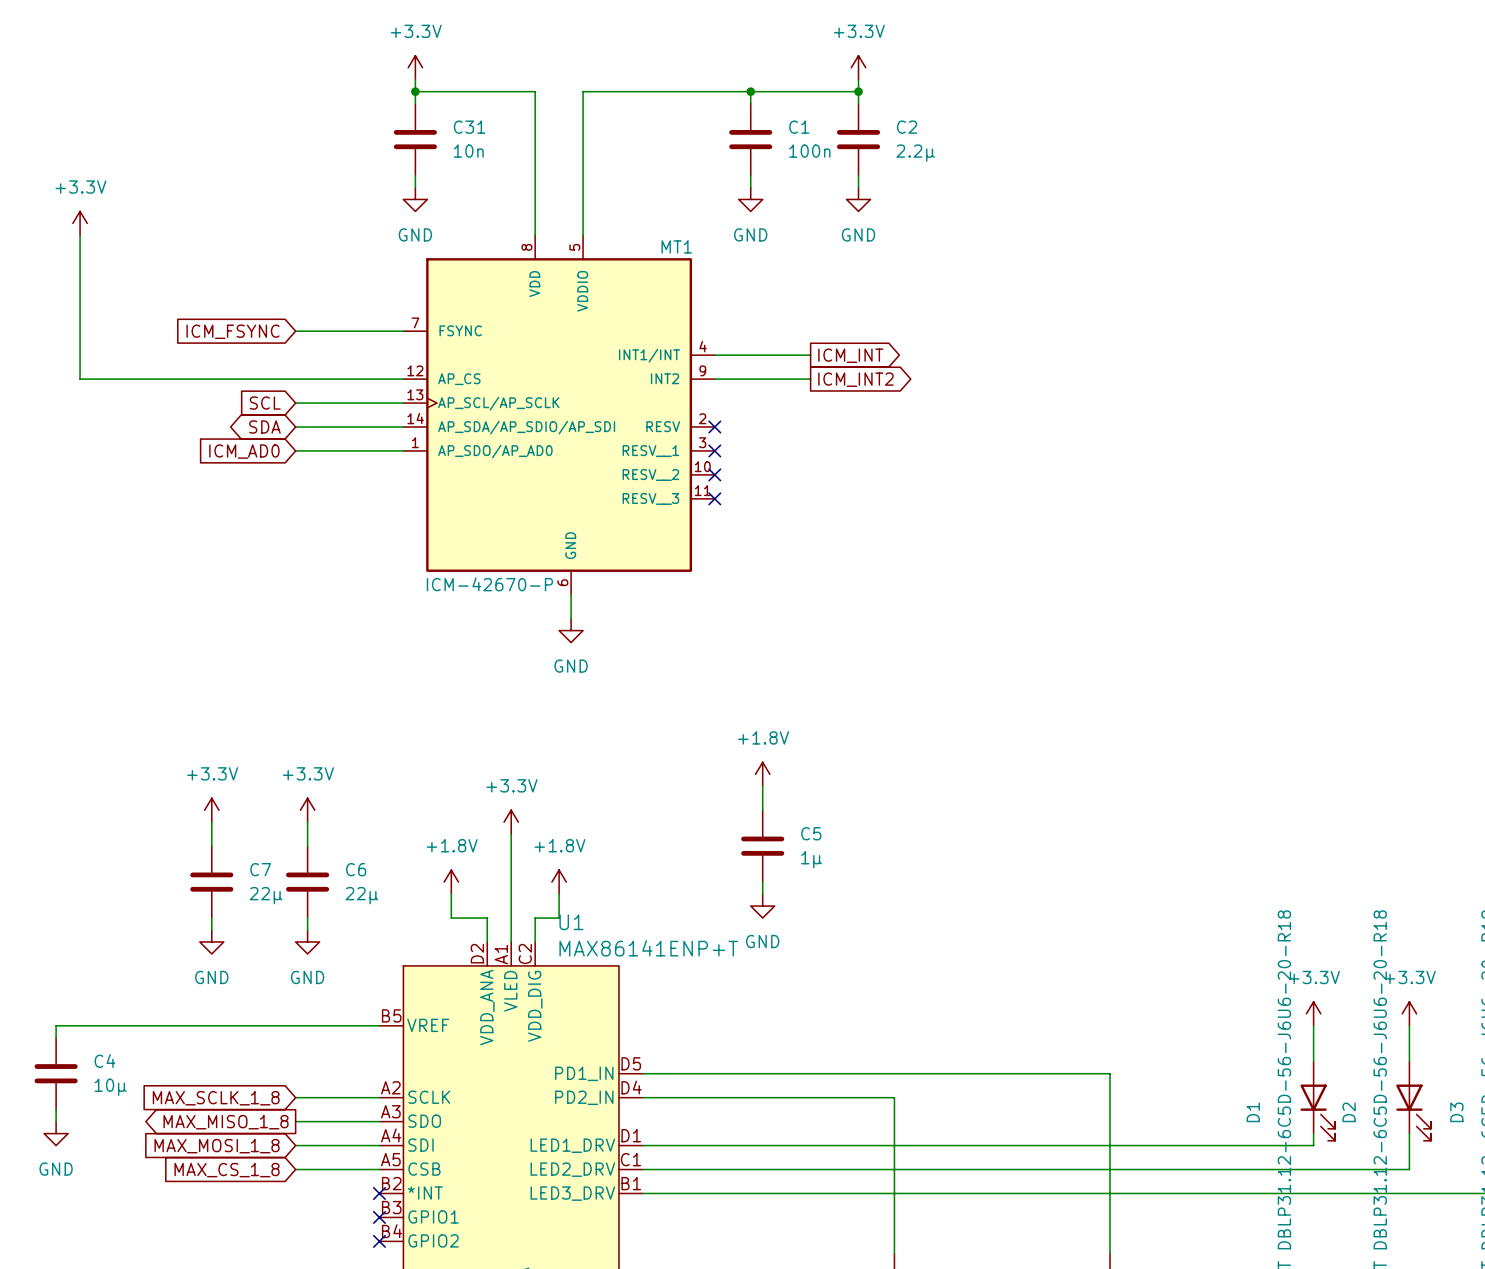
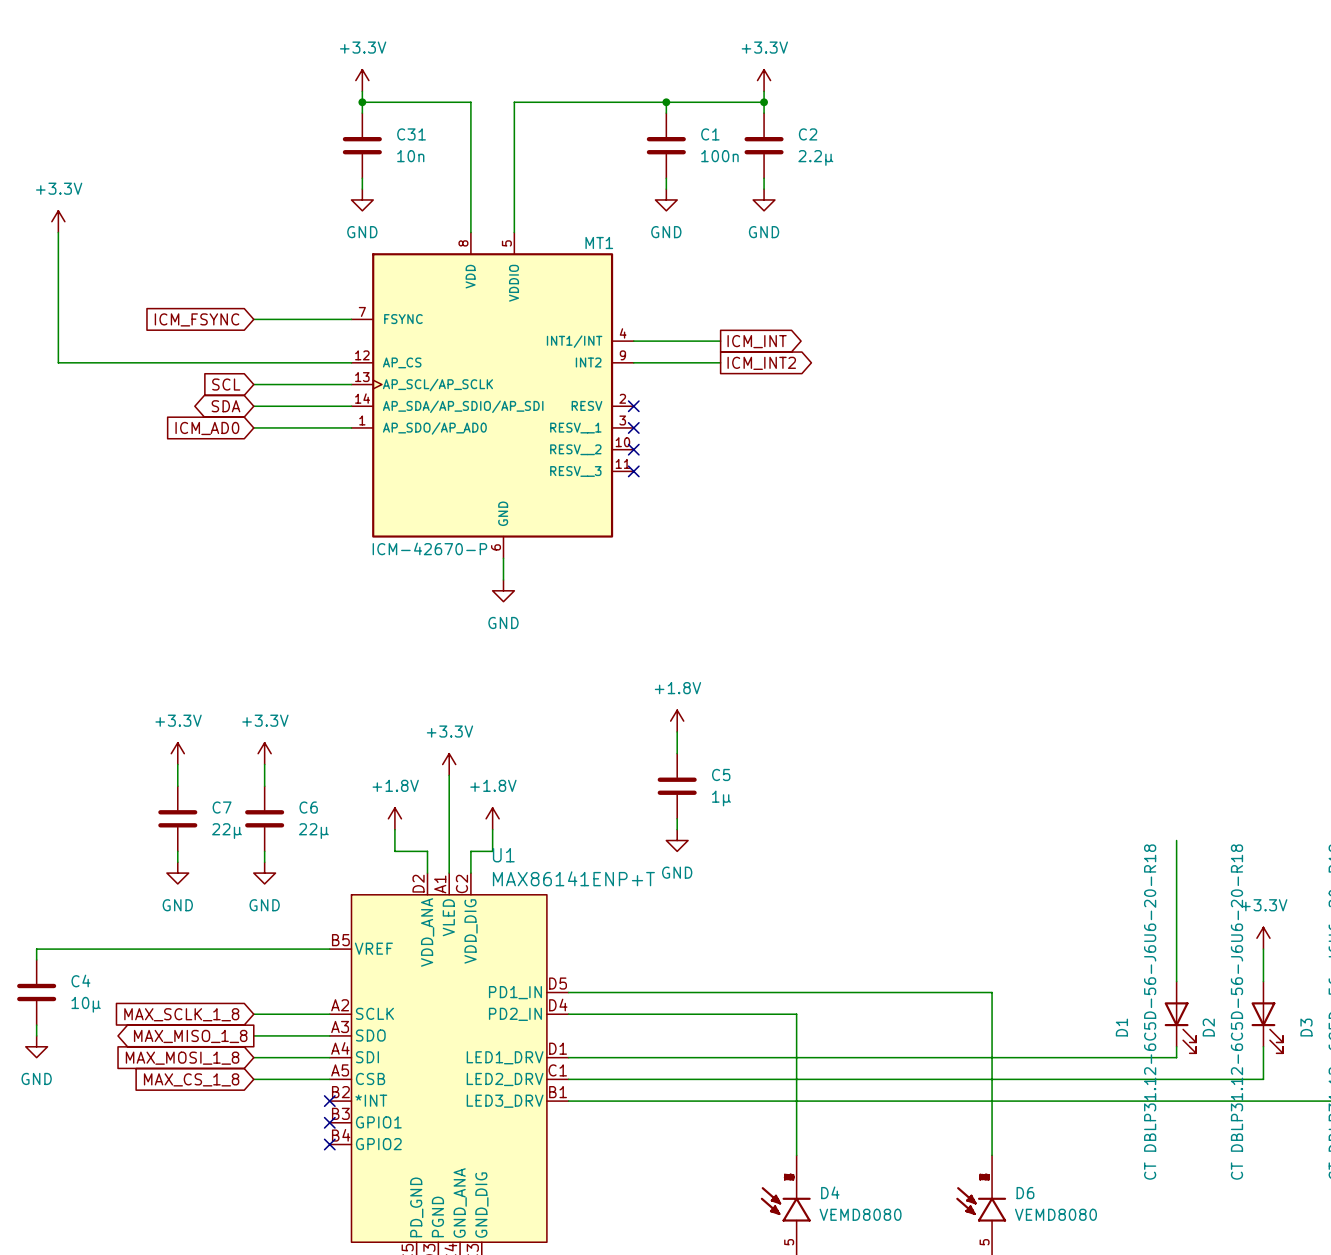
wire: none -> (1176, 840) (1176, 949)
power symbol: +3.3V (1313, 1013) -> none

